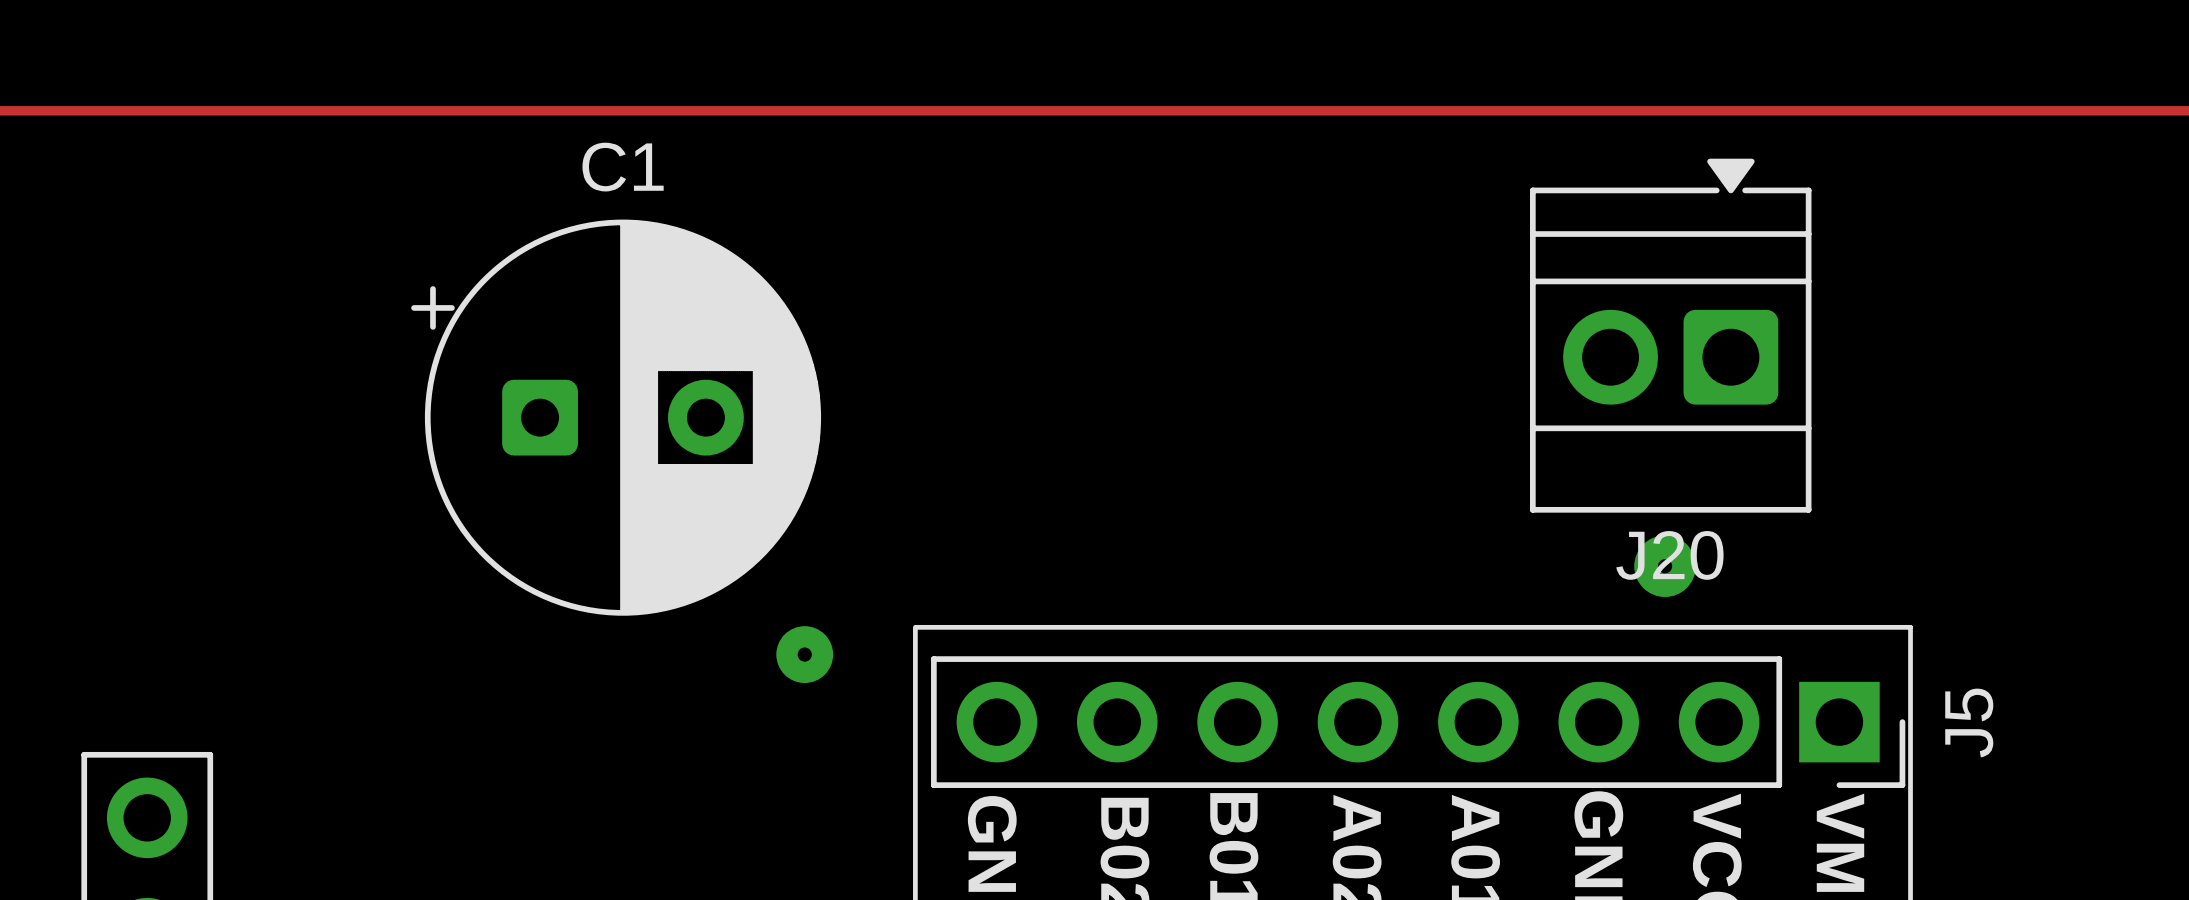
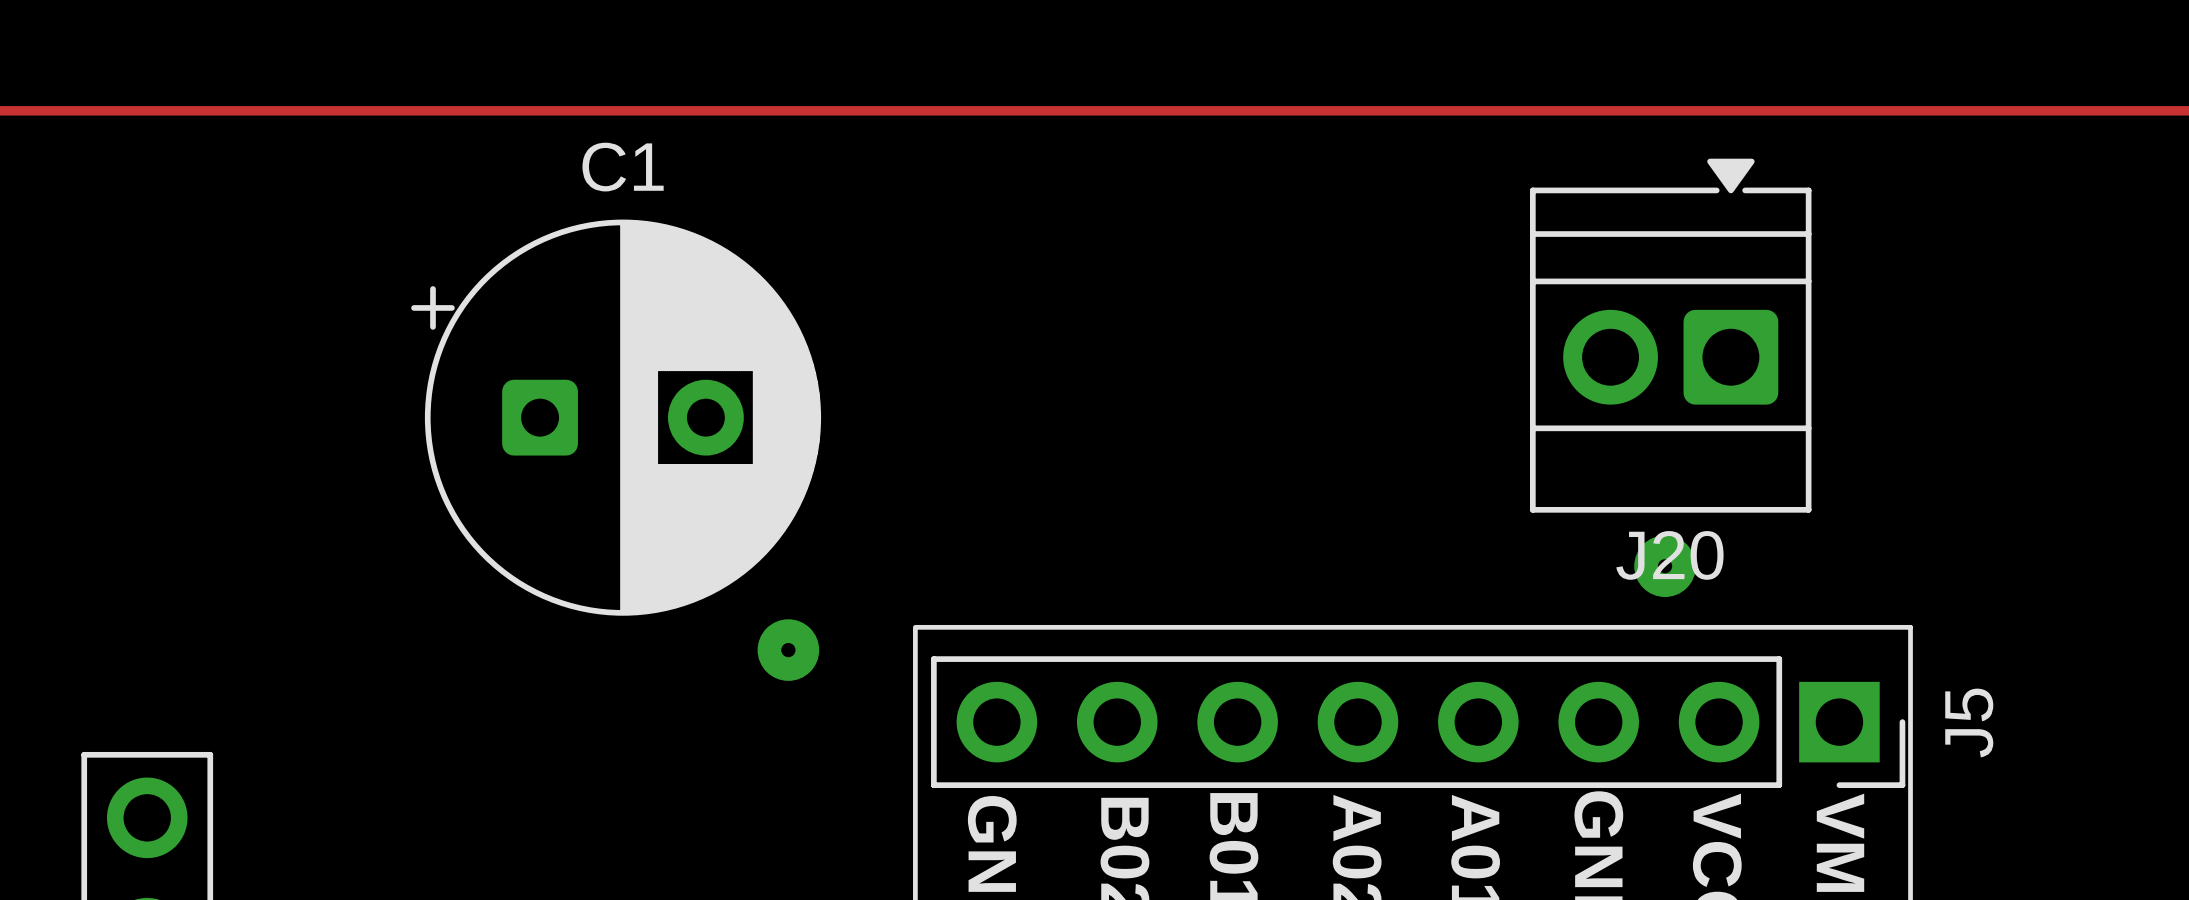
via position: (804, 654) -> (788, 650)

